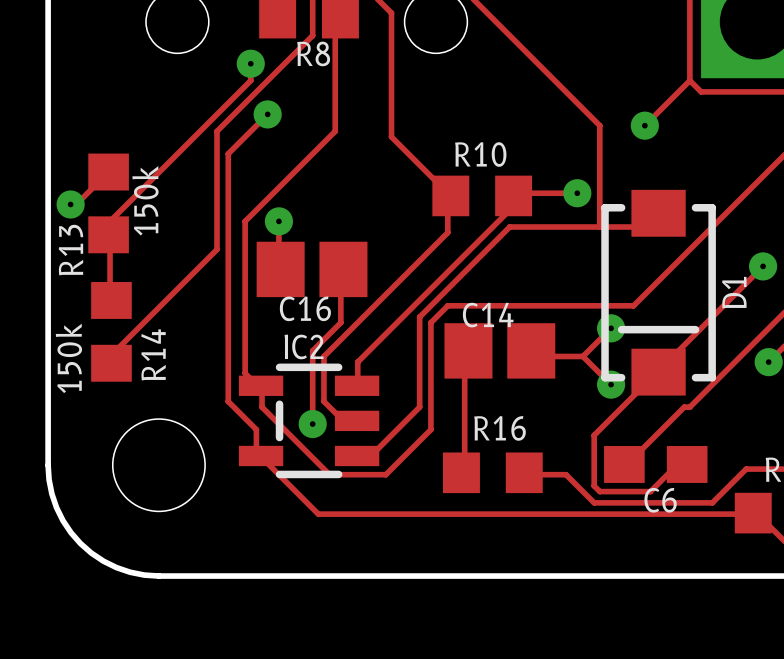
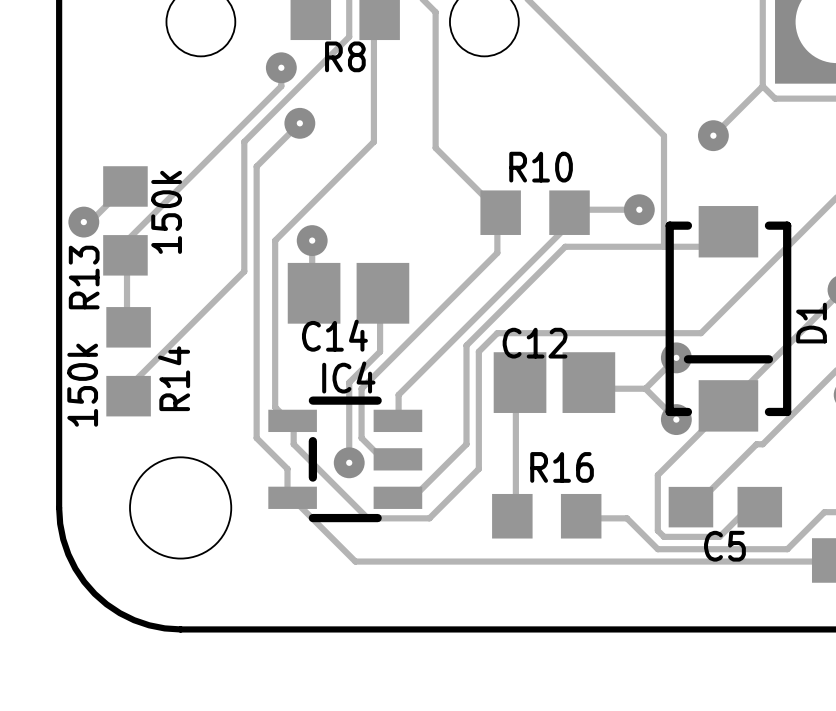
C16 name: C16 (305, 308) -> C14 (334, 335)
C14 name: C14 (488, 315) -> C12 (535, 343)
IC2 name: IC2 (304, 346) -> IC4 (348, 377)
C6 name: C6 (660, 500) -> C5 (724, 546)

